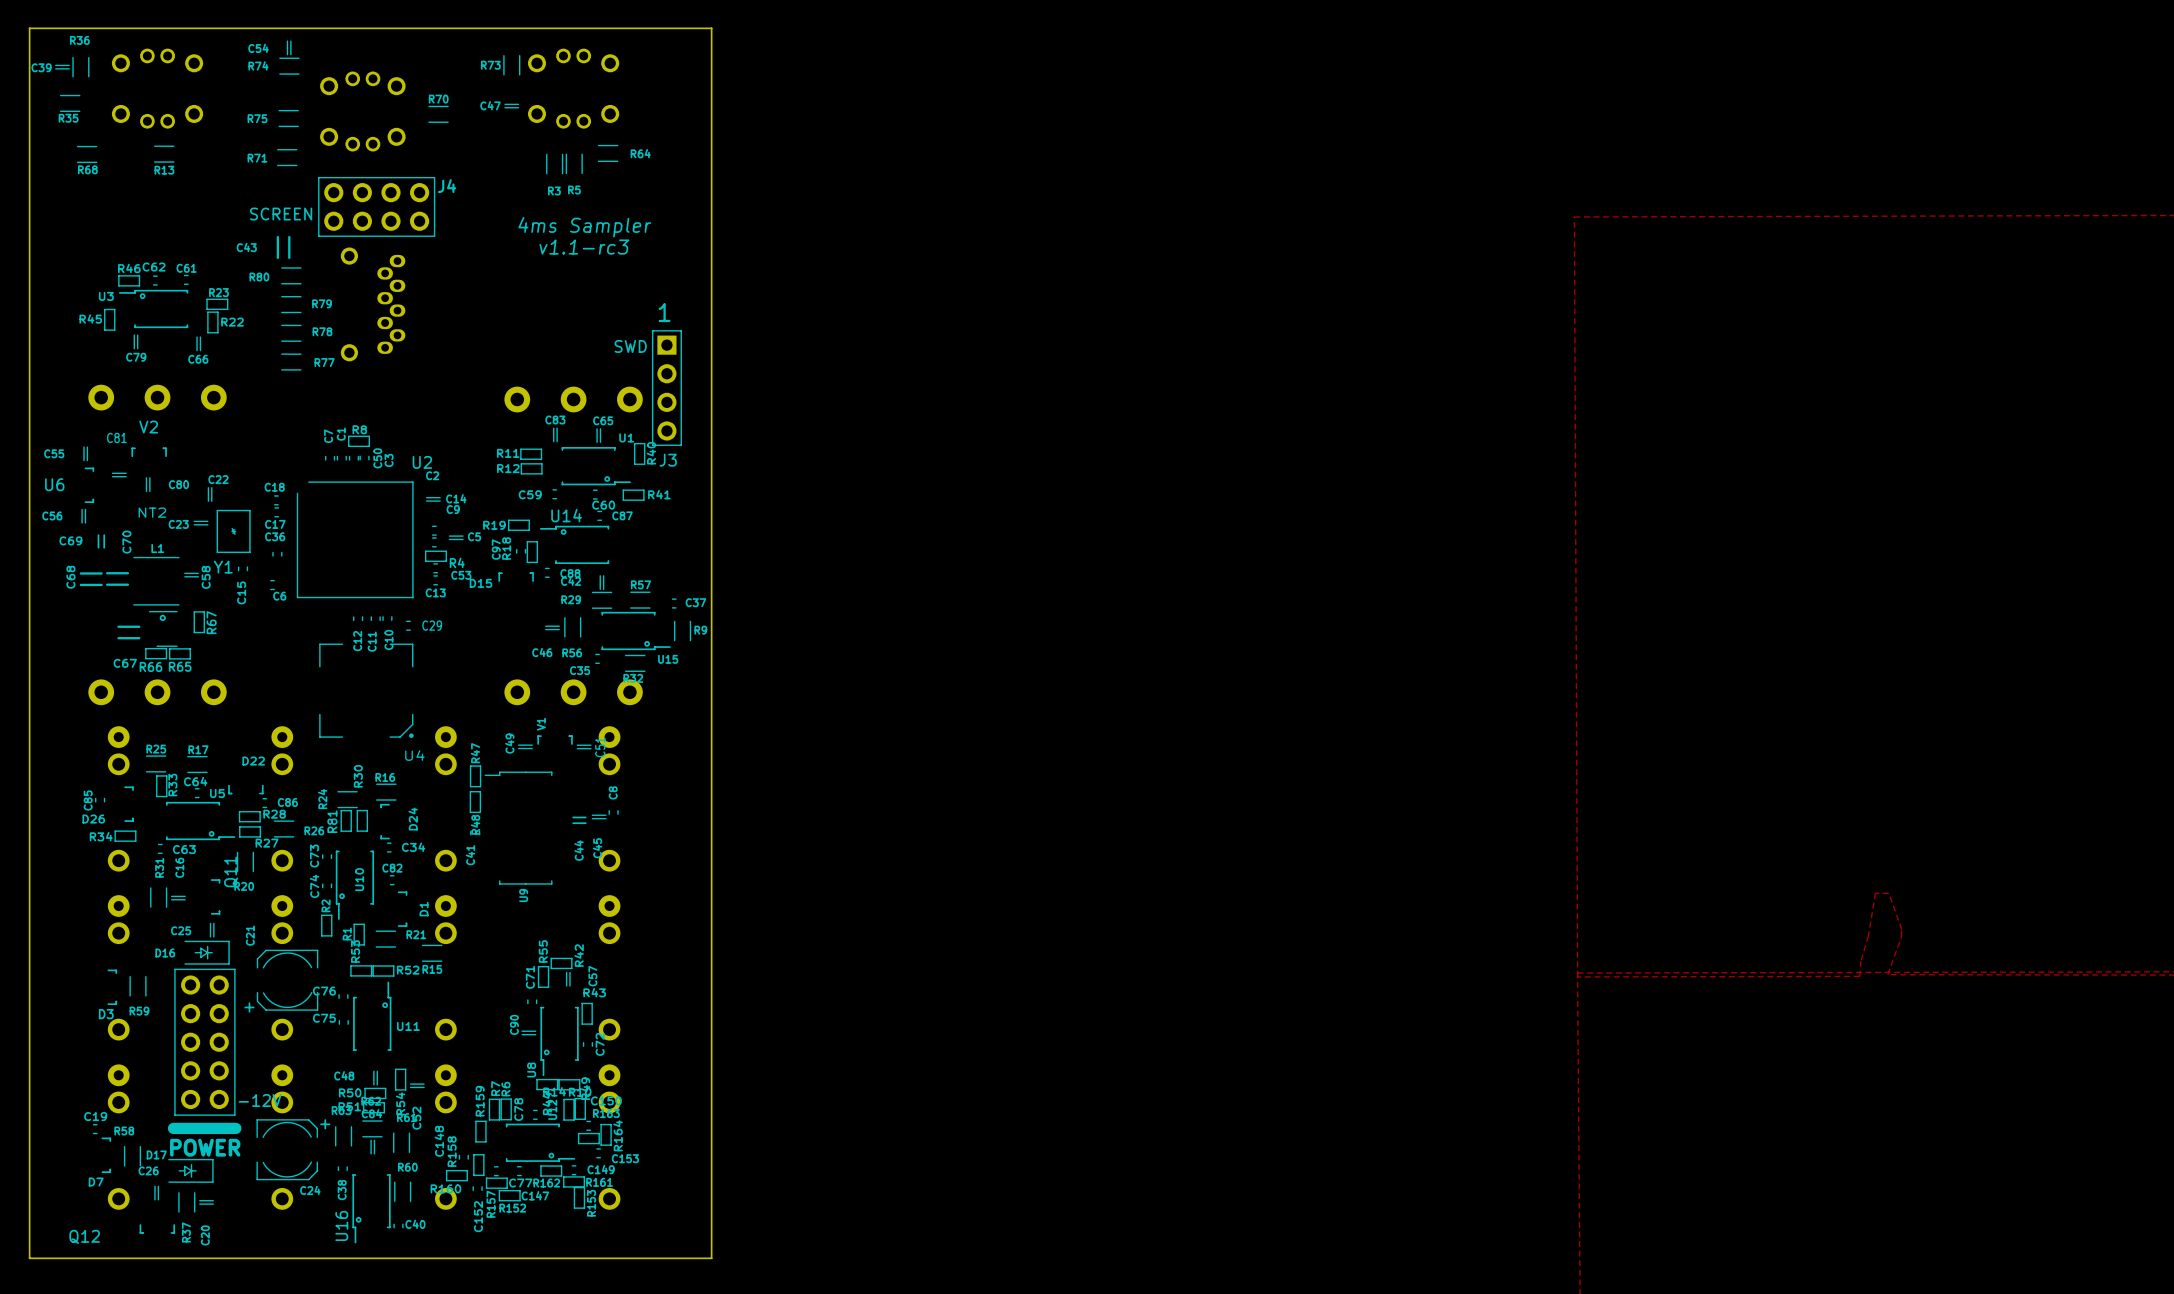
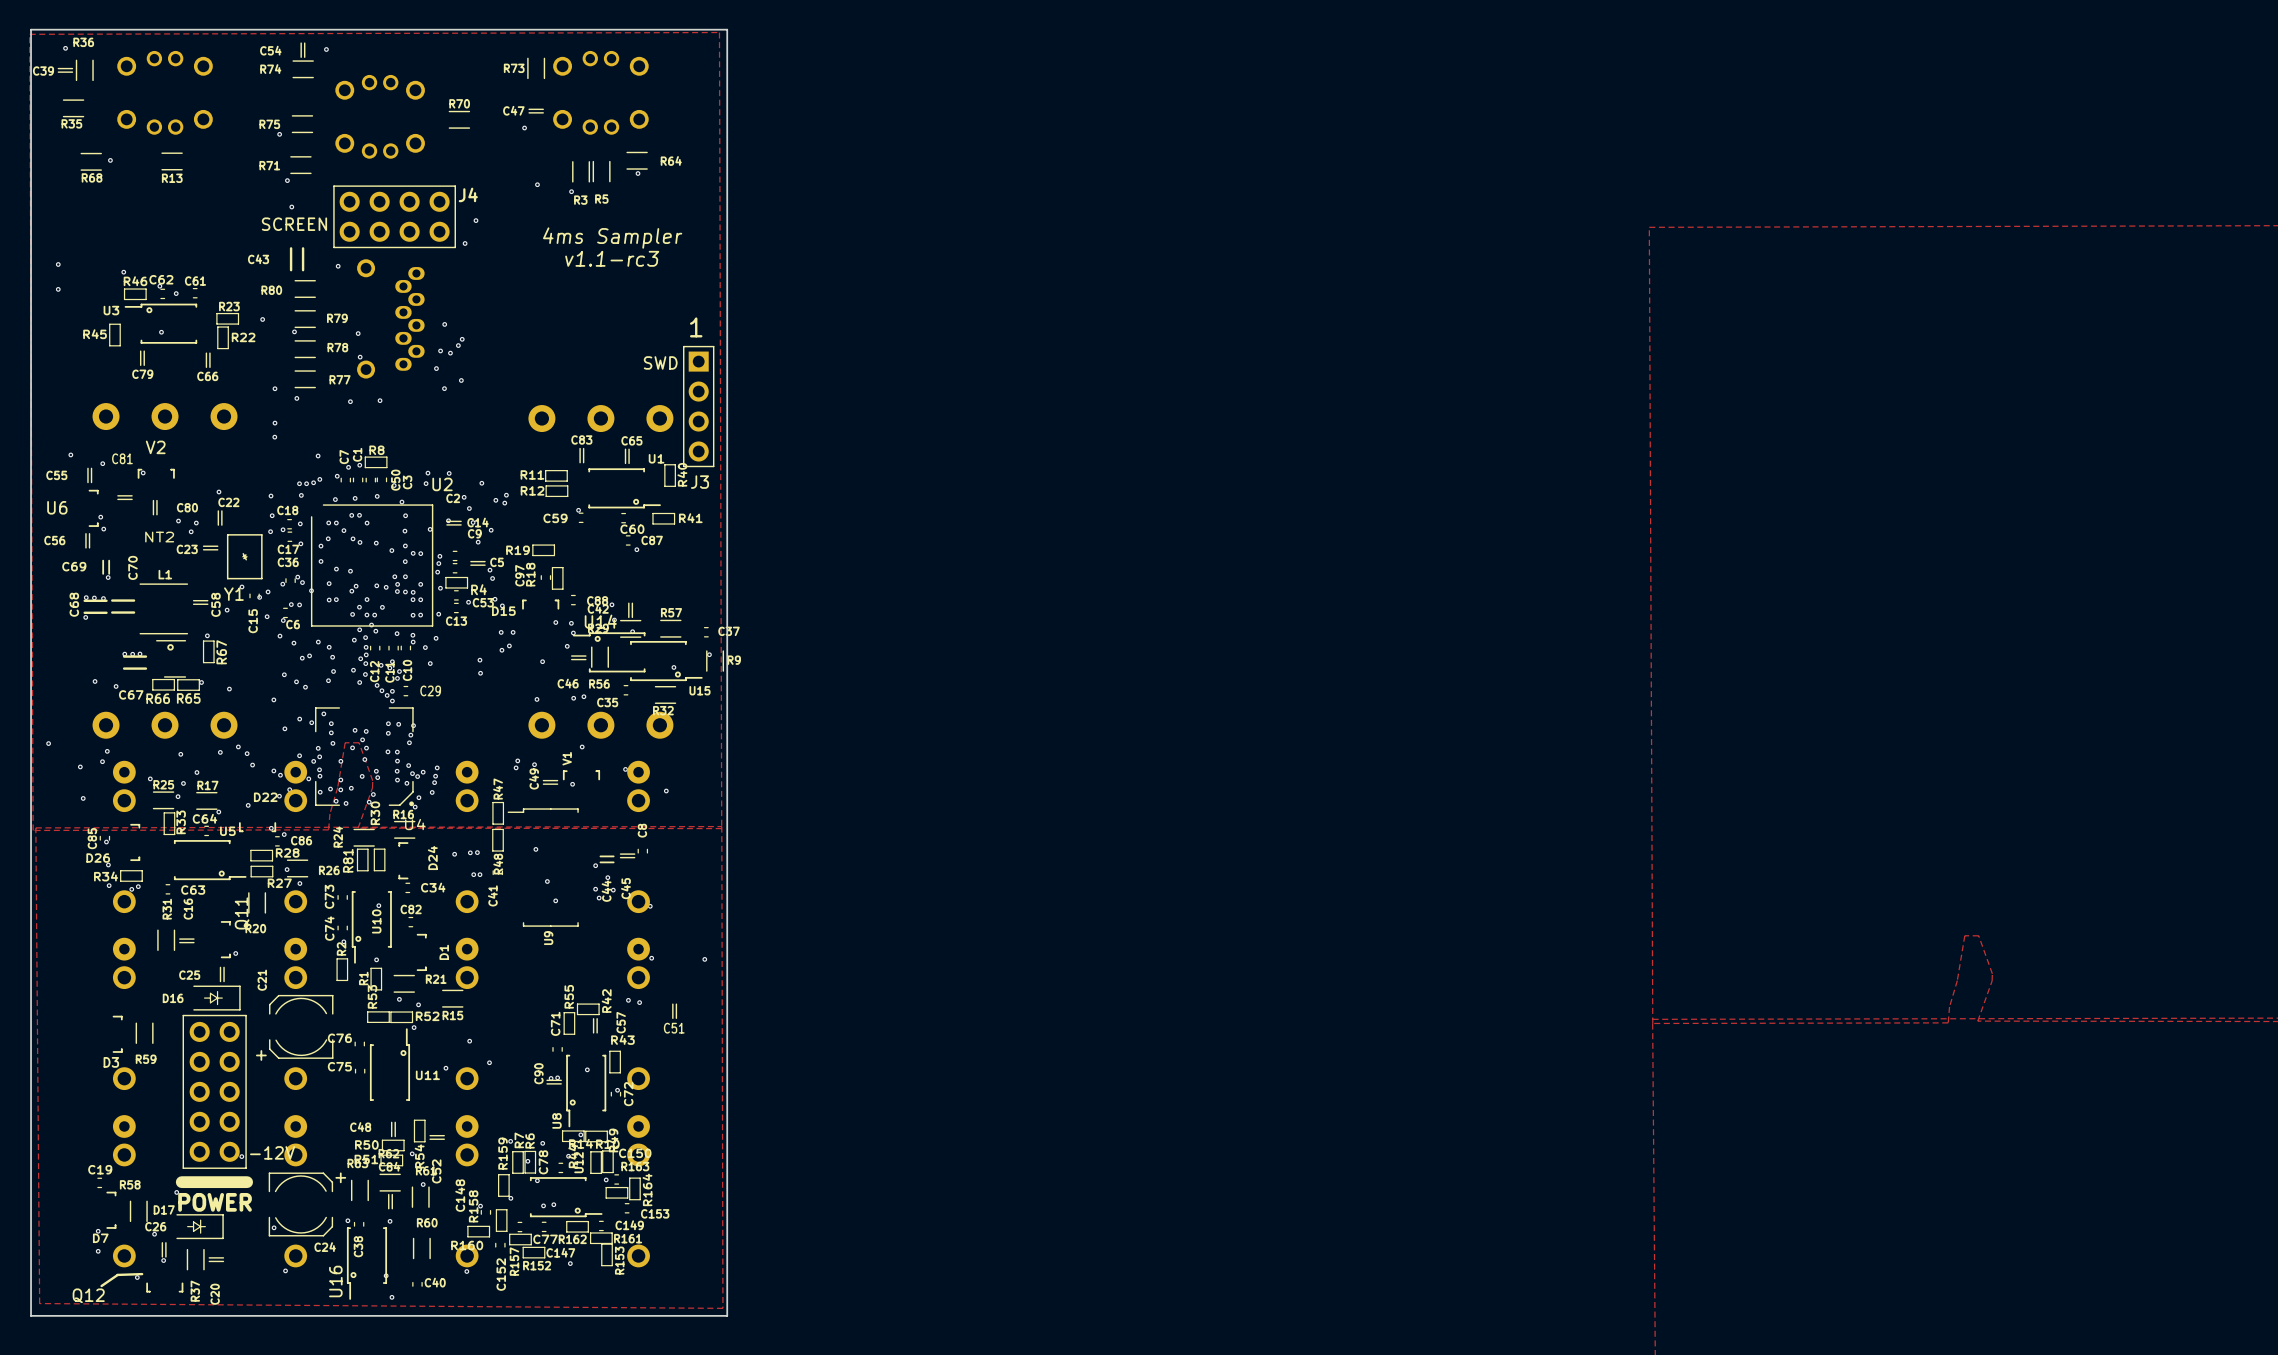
board edge: (694, 28) (711, 28) (711, 1258) (29, 1258) (29, 1256) -> (727, 29) (727, 1315) (31, 1315)
zone outline: none -> (719, 32) (29, 34) (33, 830) (328, 829) (329, 813) (337, 787) (345, 742) (359, 742) (372, 780) (372, 787) (358, 828) (721, 828) (719, 32)
via: none -> (65, 48)
via: none -> (326, 49)
via: none -> (524, 128)
via: none -> (279, 134)
via: none -> (110, 160)
via: none -> (638, 173)
via: none -> (287, 180)
via: none -> (537, 184)
via: none -> (571, 191)
via: none -> (291, 207)
via: none -> (475, 220)
via: none -> (465, 243)
via: none -> (58, 264)
via: none -> (338, 266)
via: none -> (123, 272)
via: none -> (159, 286)
via: none -> (58, 289)
via: none -> (176, 293)
via: none -> (262, 319)
via: none -> (444, 324)
via: none -> (294, 331)
via: none -> (161, 332)
via: none -> (358, 333)
via: none -> (462, 339)
via: none -> (458, 345)
via: none -> (440, 350)
via: none -> (450, 353)
via: none -> (360, 357)
via: none -> (436, 368)
via: none -> (461, 380)
via: none -> (444, 388)
via: none -> (274, 388)
via: none -> (296, 398)
via: none -> (380, 400)
via: none -> (350, 401)
via: none -> (274, 423)
via: none -> (274, 437)
via: none -> (70, 454)
via: none -> (318, 456)
via: none -> (102, 463)
via: none -> (359, 465)
via: none -> (348, 467)
via: none -> (143, 473)
via: none -> (427, 473)
via: none -> (449, 473)
via: none -> (337, 476)
via: none -> (319, 479)
via: none -> (313, 482)
via: none -> (299, 483)
via: none -> (306, 483)
via: none -> (426, 483)
via: none -> (481, 483)
via: none -> (394, 485)
via: none -> (218, 492)
via: none -> (301, 495)
via: none -> (506, 495)
via: none -> (271, 496)
via: none -> (377, 496)
via: none -> (464, 497)
via: none -> (355, 498)
via: none -> (335, 499)
via: none -> (495, 500)
via: none -> (401, 502)
via: none -> (504, 503)
via: none -> (469, 508)
via: none -> (578, 510)
via: none -> (351, 515)
via: none -> (359, 515)
via: none -> (272, 515)
via: none -> (405, 515)
via: none -> (100, 517)
via: none -> (178, 521)
via: none -> (448, 520)
via: none -> (473, 522)
via: none -> (196, 523)
via: none -> (328, 522)
via: none -> (336, 523)
via: none -> (367, 523)
via: none -> (300, 523)
via: none -> (103, 529)
via: none -> (283, 529)
via: none -> (430, 529)
via: none -> (343, 530)
via: none -> (404, 531)
via: none -> (491, 530)
via: none -> (191, 531)
via: none -> (270, 531)
via: none -> (328, 538)
via: none -> (353, 538)
via: none -> (359, 542)
via: none -> (478, 542)
via: none -> (376, 543)
via: none -> (300, 543)
via: none -> (320, 546)
via: none -> (405, 545)
via: none -> (636, 549)
via: none -> (391, 550)
via: none -> (413, 553)
via: none -> (420, 553)
via: none -> (439, 556)
via: none -> (321, 561)
via: none -> (405, 561)
via: none -> (438, 563)
via: none -> (336, 569)
via: none -> (489, 570)
U14 position: (574, 544) -> (609, 652)
via: none -> (350, 571)
via: none -> (437, 572)
via: none -> (297, 577)
via: none -> (394, 576)
via: none -> (405, 576)
via: none -> (108, 577)
via: none -> (492, 578)
via: none -> (302, 582)
via: none -> (282, 584)
via: none -> (329, 583)
via: none -> (397, 584)
via: none -> (420, 584)
via: none -> (356, 586)
via: none -> (376, 585)
via: none -> (241, 586)
via: none -> (386, 587)
via: none -> (440, 588)
via: none -> (311, 590)
via: none -> (351, 591)
via: none -> (397, 591)
via: none -> (268, 591)
via: none -> (405, 591)
via: none -> (413, 592)
via: none -> (86, 597)
via: none -> (94, 597)
via: none -> (259, 597)
via: none -> (103, 598)
via: none -> (329, 600)
via: none -> (336, 599)
via: none -> (367, 599)
via: none -> (413, 599)
via: none -> (420, 599)
via: none -> (495, 599)
via: none -> (468, 602)
via: none -> (291, 604)
via: none -> (299, 604)
via: none -> (611, 604)
via: none -> (502, 605)
via: none -> (359, 607)
via: none -> (382, 607)
via: none -> (227, 610)
via: none -> (352, 614)
via: none -> (438, 614)
via: none -> (366, 615)
via: none -> (374, 615)
via: none -> (413, 615)
via: none -> (420, 615)
via: none -> (267, 616)
via: none -> (85, 617)
via: none -> (614, 620)
via: none -> (283, 620)
via: none -> (555, 622)
via: none -> (571, 623)
via: none -> (371, 625)
via: none -> (359, 629)
via: none -> (375, 631)
via: none -> (501, 632)
via: none -> (513, 632)
via: none -> (632, 631)
via: none -> (397, 633)
via: none -> (573, 633)
via: none -> (207, 635)
via: none -> (412, 635)
via: none -> (279, 636)
via: none -> (365, 637)
via: none -> (436, 638)
via: none -> (354, 640)
via: none -> (318, 642)
via: none -> (413, 642)
via: none -> (293, 643)
via: none -> (509, 645)
via: none -> (567, 646)
via: none -> (329, 647)
via: none -> (366, 647)
via: none -> (425, 647)
via: none -> (501, 650)
via: none -> (124, 654)
via: none -> (132, 654)
via: none -> (140, 654)
via: none -> (709, 654)
via: none -> (366, 654)
C29 position: (408, 625) -> (405, 691)
via: none -> (309, 655)
via: none -> (332, 657)
via: none -> (302, 658)
via: none -> (360, 658)
via: none -> (479, 660)
via: none -> (392, 661)
via: none -> (542, 661)
via: none -> (365, 663)
via: none -> (430, 663)
via: none -> (381, 665)
via: none -> (389, 668)
via: none -> (673, 667)
via: none -> (353, 670)
via: none -> (333, 671)
via: none -> (399, 671)
via: none -> (480, 673)
via: none -> (365, 674)
via: none -> (284, 674)
via: none -> (397, 678)
via: none -> (328, 680)
via: none -> (95, 681)
via: none -> (296, 681)
via: none -> (201, 682)
via: none -> (359, 682)
via: none -> (377, 685)
via: none -> (116, 686)
via: none -> (305, 687)
via: none -> (229, 689)
via: none -> (381, 690)
via: none -> (392, 691)
via: none -> (387, 695)
via: none -> (583, 696)
via: none -> (573, 698)
via: none -> (536, 699)
via: none -> (273, 699)
via: none -> (392, 701)
via: none -> (323, 713)
via: none -> (299, 719)
via: none -> (311, 722)
via: none -> (331, 723)
U4 position: (366, 690) -> (364, 756)
via: none -> (388, 723)
via: none -> (398, 724)
via: none -> (413, 725)
via: none -> (284, 728)
via: none -> (355, 730)
via: none -> (366, 731)
via: none -> (331, 732)
via: none -> (388, 733)
via: none -> (410, 735)
via: none -> (362, 739)
via: none -> (48, 743)
via: none -> (332, 743)
via: none -> (409, 742)
via: none -> (238, 746)
via: none -> (352, 747)
via: none -> (582, 747)
via: none -> (318, 748)
via: none -> (366, 748)
via: none -> (107, 751)
via: none -> (387, 751)
via: none -> (397, 752)
via: none -> (220, 752)
via: none -> (247, 753)
via: none -> (180, 754)
via: none -> (299, 755)
via: none -> (319, 756)
via: none -> (364, 759)
via: none -> (313, 761)
via: none -> (340, 761)
via: none -> (397, 761)
via: none -> (517, 760)
via: none -> (102, 761)
via: none -> (534, 764)
via: none -> (252, 765)
via: none -> (408, 765)
via: none -> (80, 766)
via: none -> (516, 767)
via: none -> (437, 767)
via: none -> (319, 769)
via: none -> (625, 769)
via: none -> (273, 770)
via: none -> (376, 771)
via: none -> (397, 771)
via: none -> (196, 772)
via: none -> (423, 772)
via: none -> (412, 773)
via: none -> (280, 775)
via: none -> (319, 776)
via: none -> (435, 776)
via: none -> (362, 776)
via: none -> (417, 776)
via: none -> (377, 777)
via: none -> (150, 778)
via: none -> (308, 778)
via: none -> (340, 779)
via: none -> (397, 780)
C51 rotation: 0° (584, 746) -> 90° clockwise (674, 1011)
C51 position: (584, 746) -> (674, 1011)
via: none -> (183, 783)
via: none -> (406, 783)
via: none -> (434, 782)
via: none -> (572, 784)
via: none -> (351, 788)
via: none -> (289, 789)
via: none -> (330, 789)
via: none -> (340, 789)
via: none -> (666, 791)
via: none -> (320, 792)
via: none -> (432, 792)
via: none -> (373, 794)
via: none -> (178, 796)
via: none -> (279, 796)
via: none -> (418, 797)
via: none -> (83, 798)
via: none -> (336, 801)
via: none -> (369, 802)
via: none -> (346, 803)
via: none -> (248, 805)
via: none -> (415, 807)
via: none -> (218, 812)
zone outline: none -> (721, 826) (35, 827) (39, 1303) (722, 1308) (721, 826)
via: none -> (271, 828)
via: none -> (284, 834)
via: none -> (106, 842)
via: none -> (535, 849)
via: none -> (477, 852)
via: none -> (470, 852)
via: none -> (454, 854)
via: none -> (108, 865)
via: none -> (595, 865)
via: none -> (287, 869)
via: none -> (473, 874)
via: none -> (480, 874)
via: none -> (607, 877)
via: none -> (547, 881)
via: none -> (299, 883)
via: none -> (109, 885)
via: none -> (138, 886)
via: none -> (131, 889)
via: none -> (595, 889)
via: none -> (613, 890)
via: none -> (599, 898)
via: none -> (555, 900)
via: none -> (378, 905)
via: none -> (650, 906)
via: none -> (343, 941)
via: none -> (235, 953)
via: none -> (651, 958)
via: none -> (704, 959)
via: none -> (376, 959)
via: none -> (399, 999)
via: none -> (628, 1000)
via: none -> (639, 1002)
via: none -> (418, 1004)
via: none -> (414, 1027)
via: none -> (469, 1041)
via: none -> (489, 1062)
via: none -> (445, 1068)
via: none -> (587, 1069)
via: none -> (557, 1077)
via: none -> (551, 1078)
via: none -> (617, 1090)
via: none -> (580, 1134)
via: none -> (510, 1141)
via: none -> (542, 1143)
via: none -> (412, 1153)
via: none -> (568, 1156)
via: none -> (241, 1156)
via: none -> (527, 1161)
via: none -> (606, 1179)
via: none -> (537, 1180)
via: none -> (423, 1184)
via: none -> (176, 1192)
via: none -> (510, 1198)
via: none -> (553, 1204)
via: none -> (480, 1206)
via: none -> (543, 1205)
via: none -> (347, 1220)
via: none -> (390, 1221)
via: none -> (274, 1227)
via: none -> (98, 1231)
via: none -> (154, 1234)
via: none -> (98, 1251)
via: none -> (163, 1260)
via: none -> (570, 1263)
U16 position: (371, 1208) -> (366, 1263)
via: none -> (285, 1270)
via: none -> (466, 1271)
line: none -> (142, 1274) (117, 1274) (101, 1286)
via: none -> (386, 1275)
via: none -> (137, 1277)
via: none -> (391, 1297)

